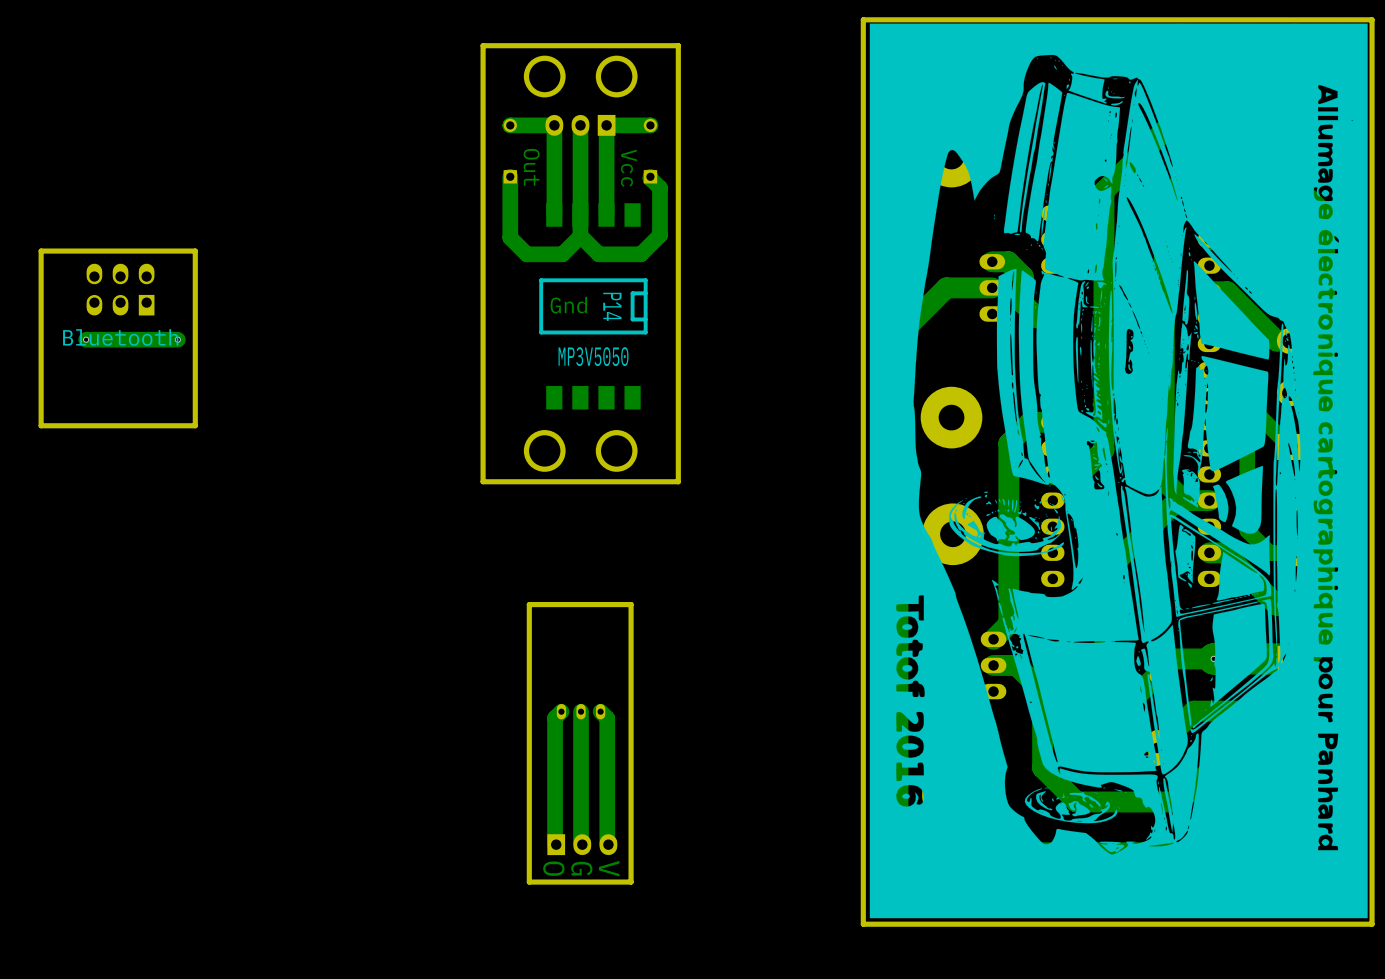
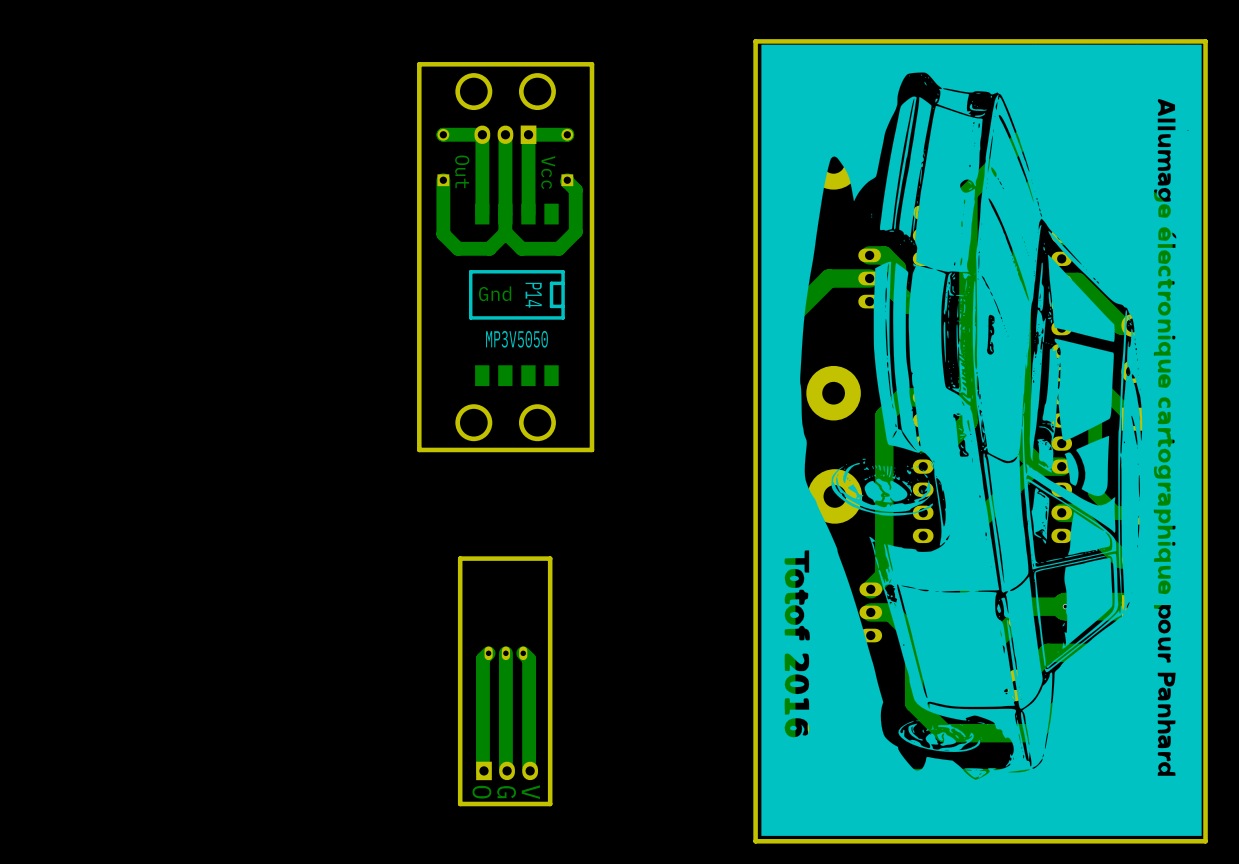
board edge: (195, 251) (195, 425) (41, 425) (41, 251) (195, 251) -> none
part: (120, 289) -> none
text: Bluetooth (120, 337) -> none
via: (86, 339) -> none
track: (177, 339) (86, 339) -> none
via: (177, 339) -> none

